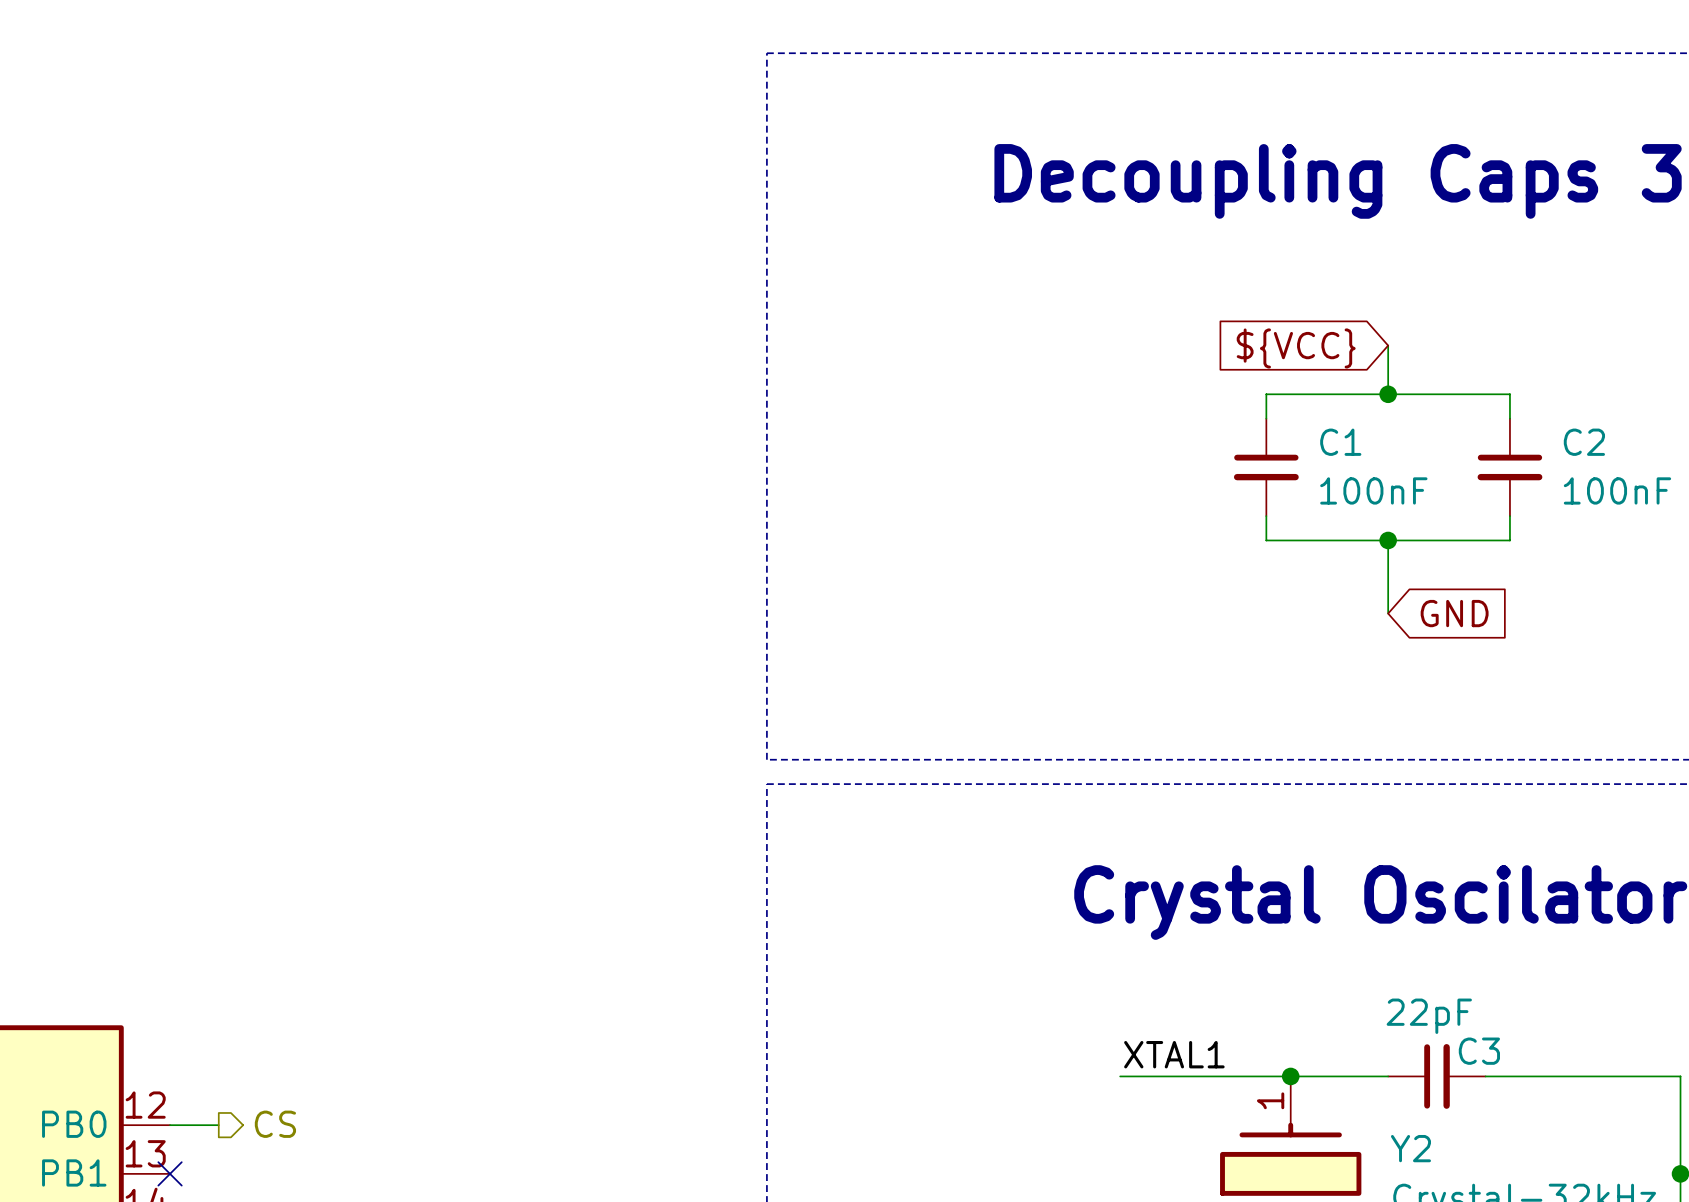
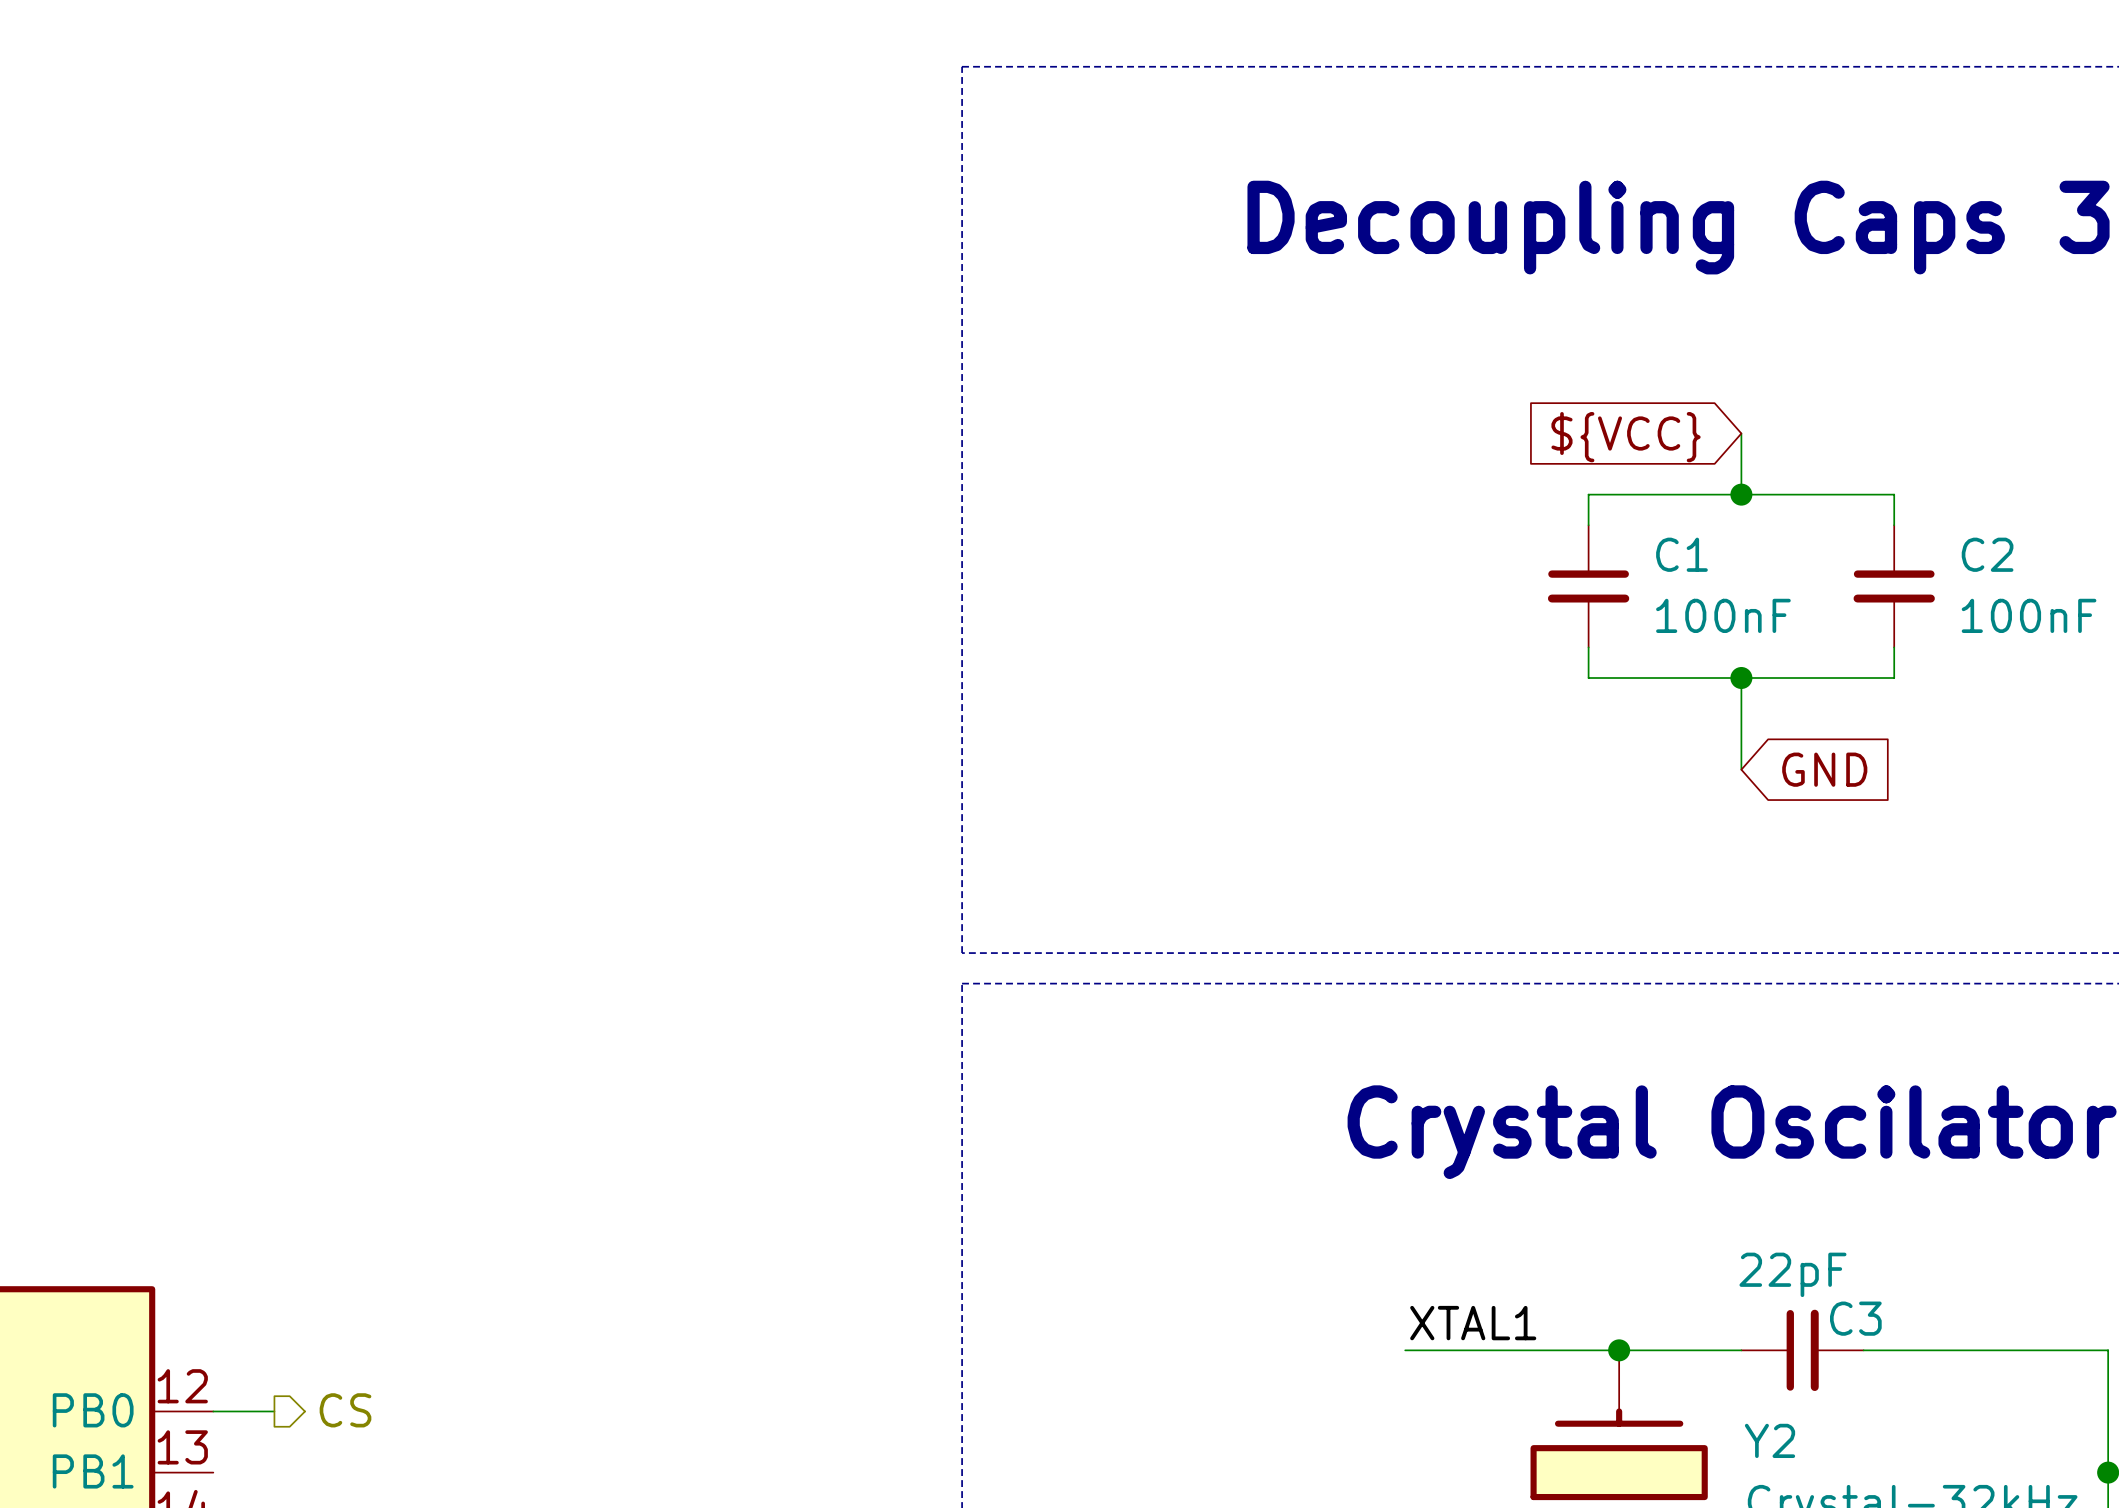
Y2 pin number: 1 (1270, 1100) -> none
no-connect mark: (170, 1173) -> none

